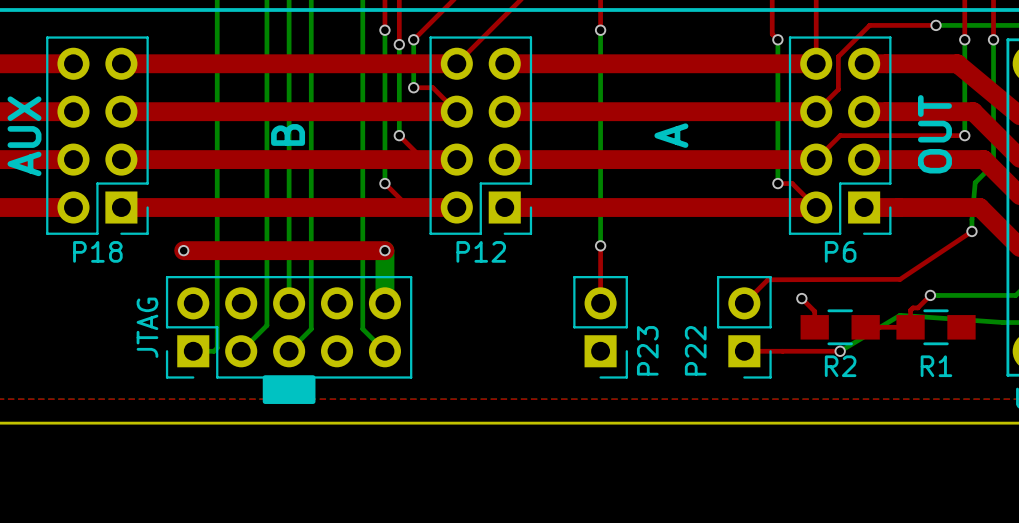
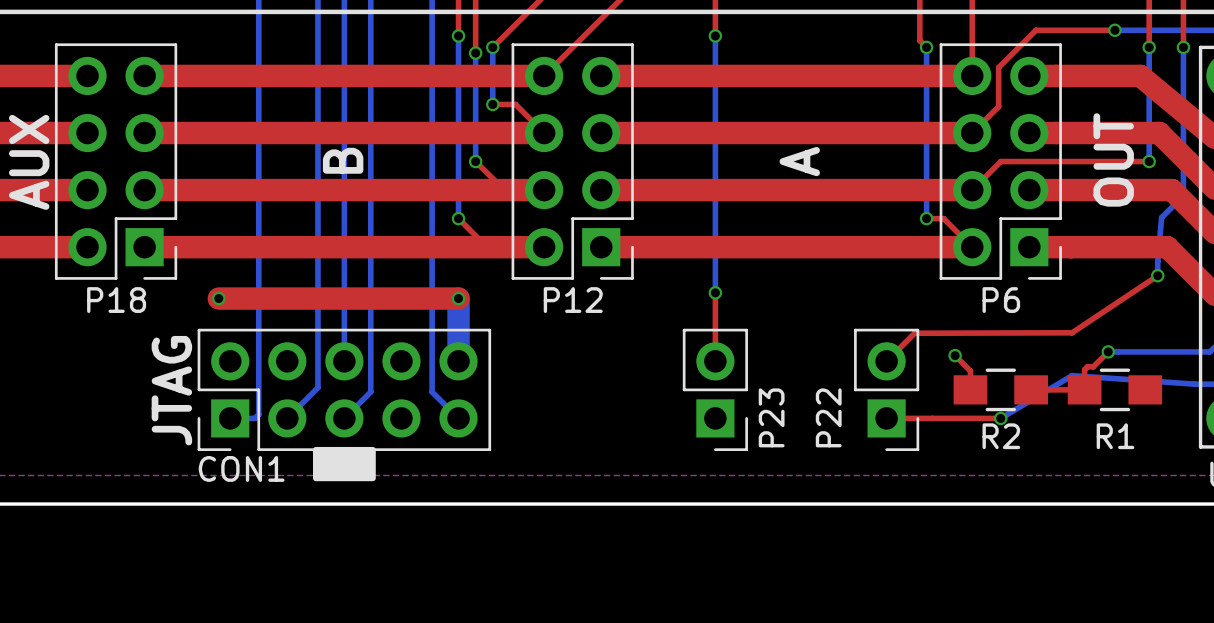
text: none -> JTAG (171, 390)
JTAG name: JTAG (147, 327) -> CON1 (241, 468)

